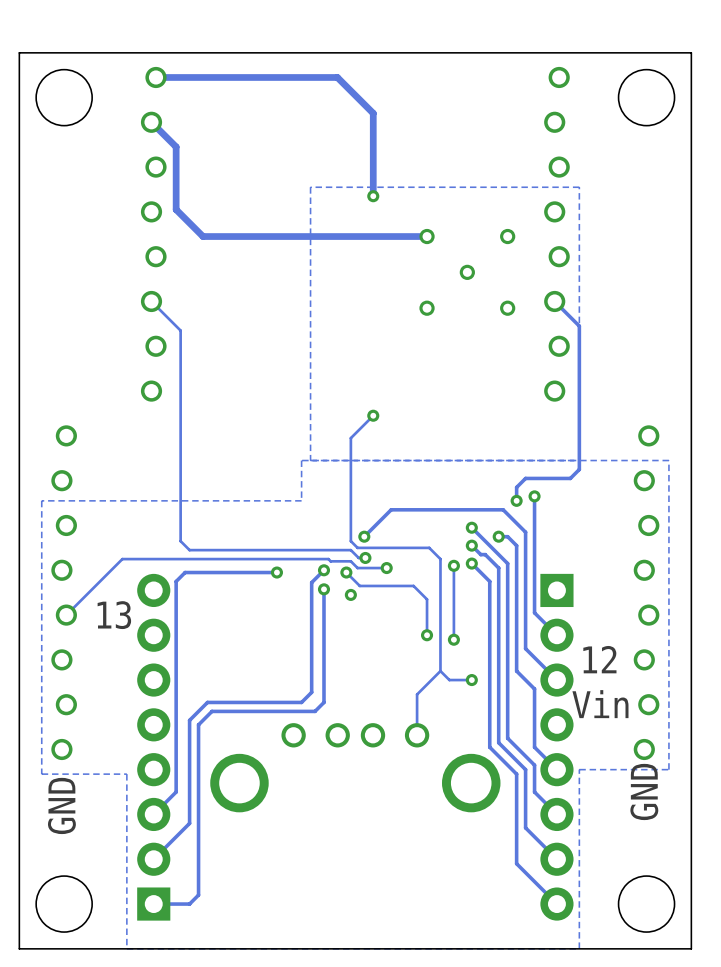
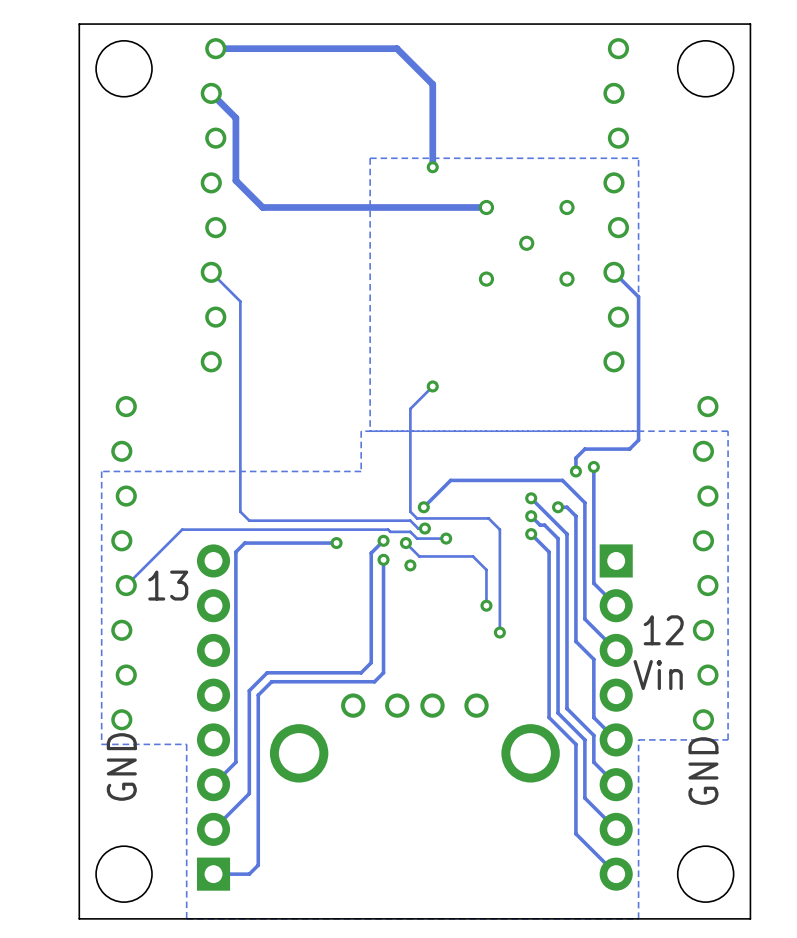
track: (453, 565) (453, 639) -> none
via: (453, 565) -> none
via: (453, 639) -> none
track: (440, 662) (440, 671) -> none
via: none -> (499, 632)
track: (440, 671) (449, 680) (471, 680) -> none
track: (440, 671) (417, 694) (417, 735) -> none
via: (471, 680) -> none

